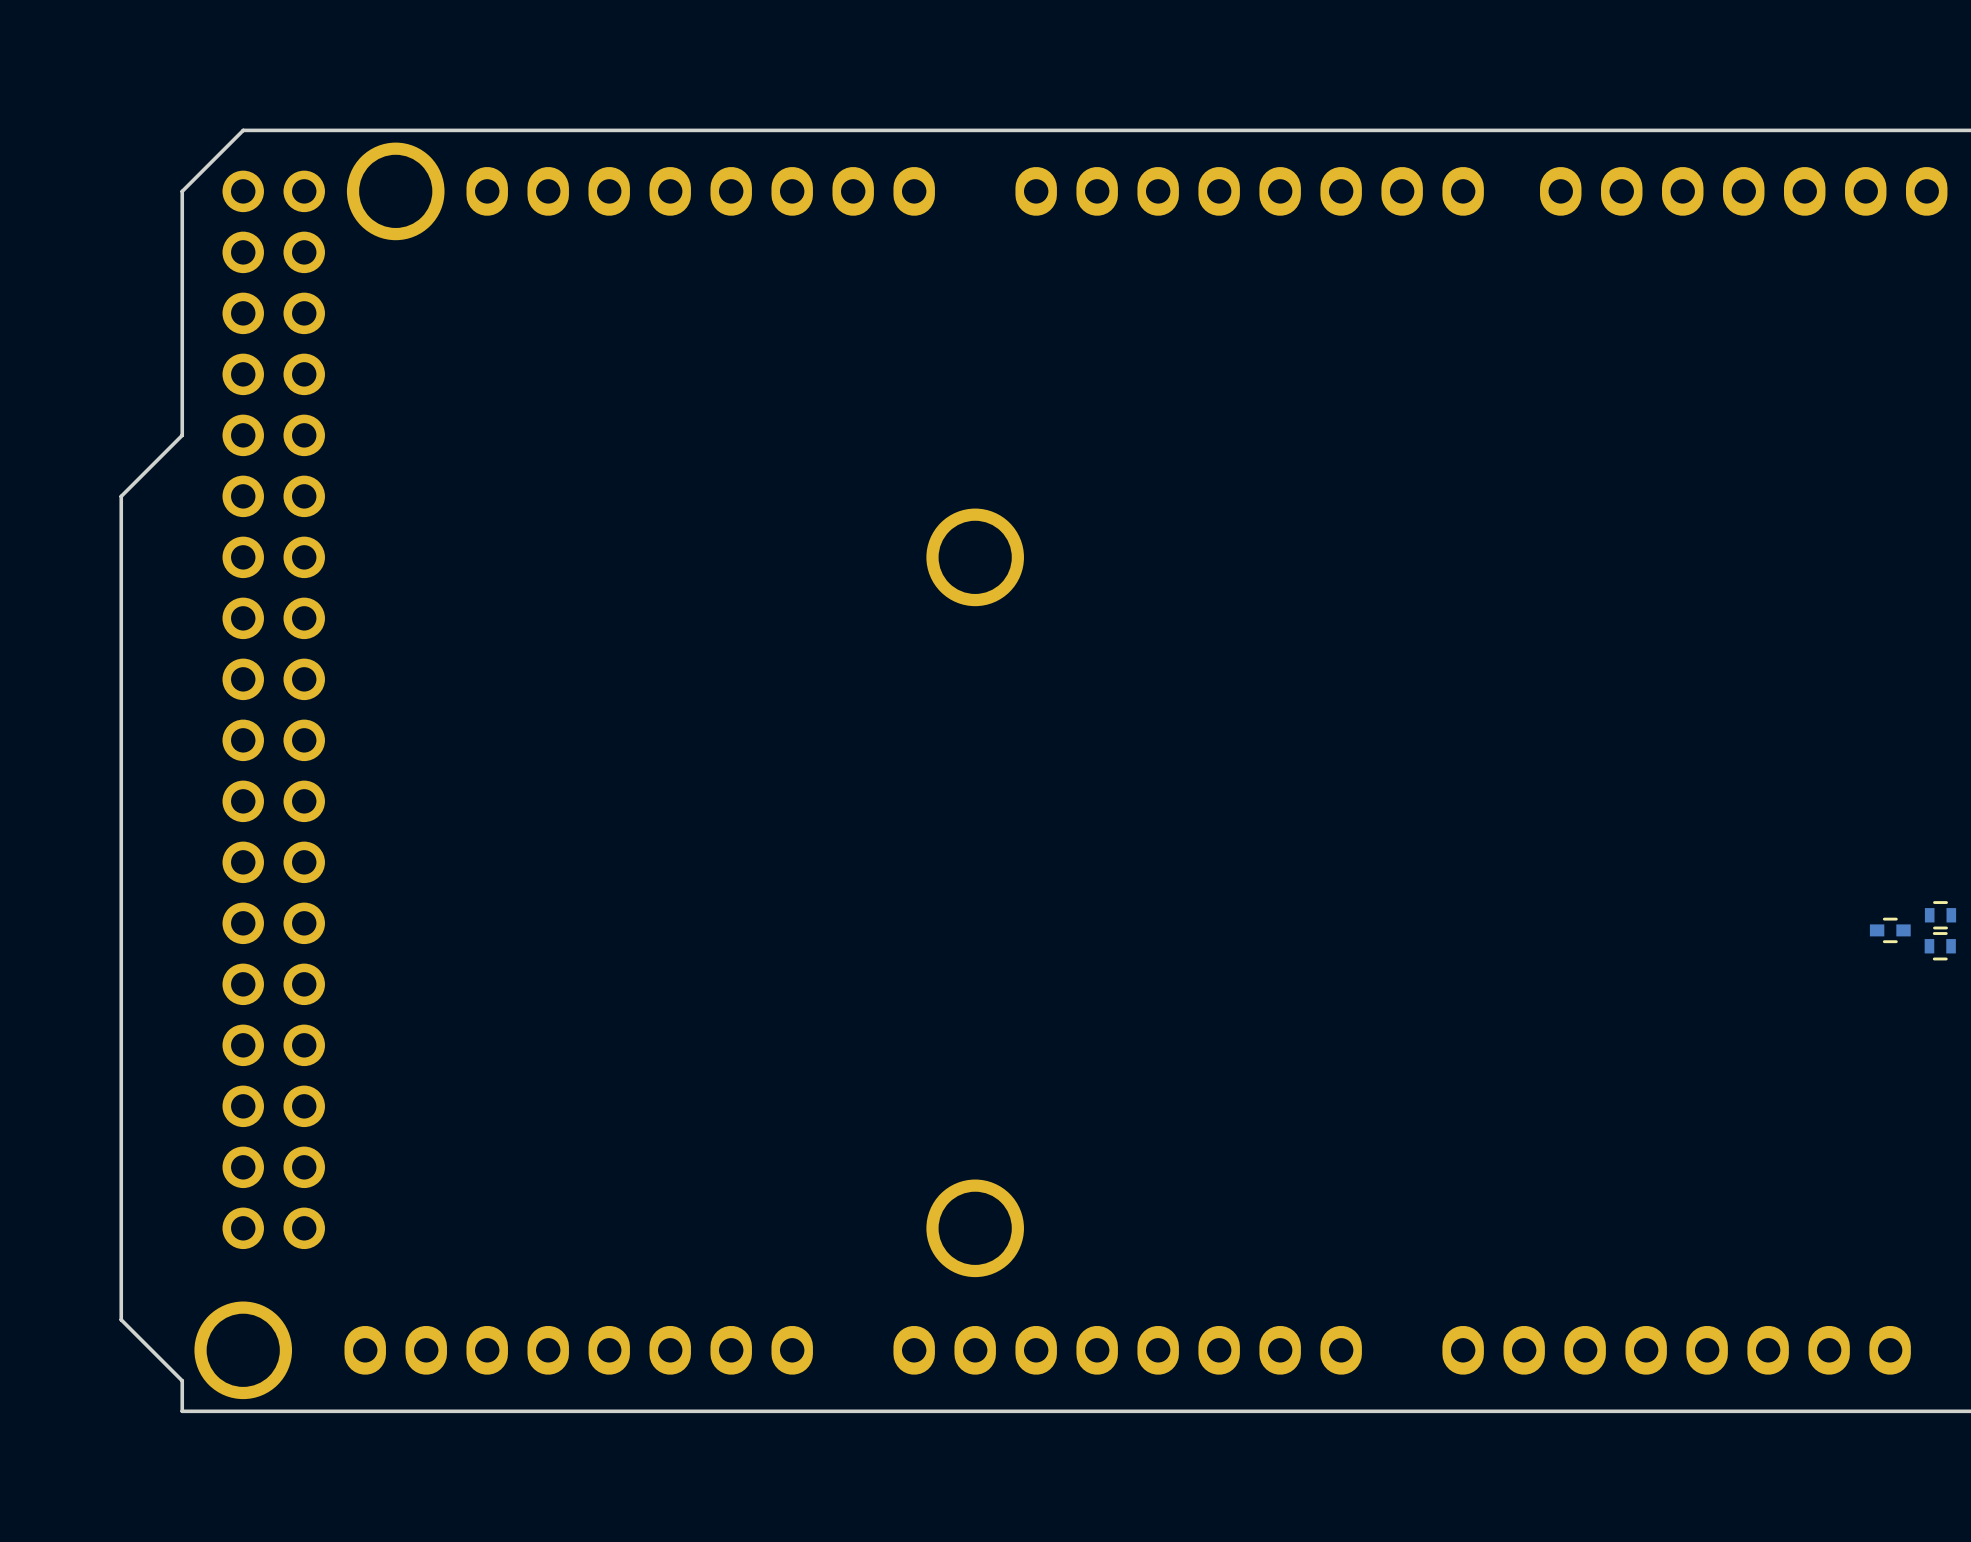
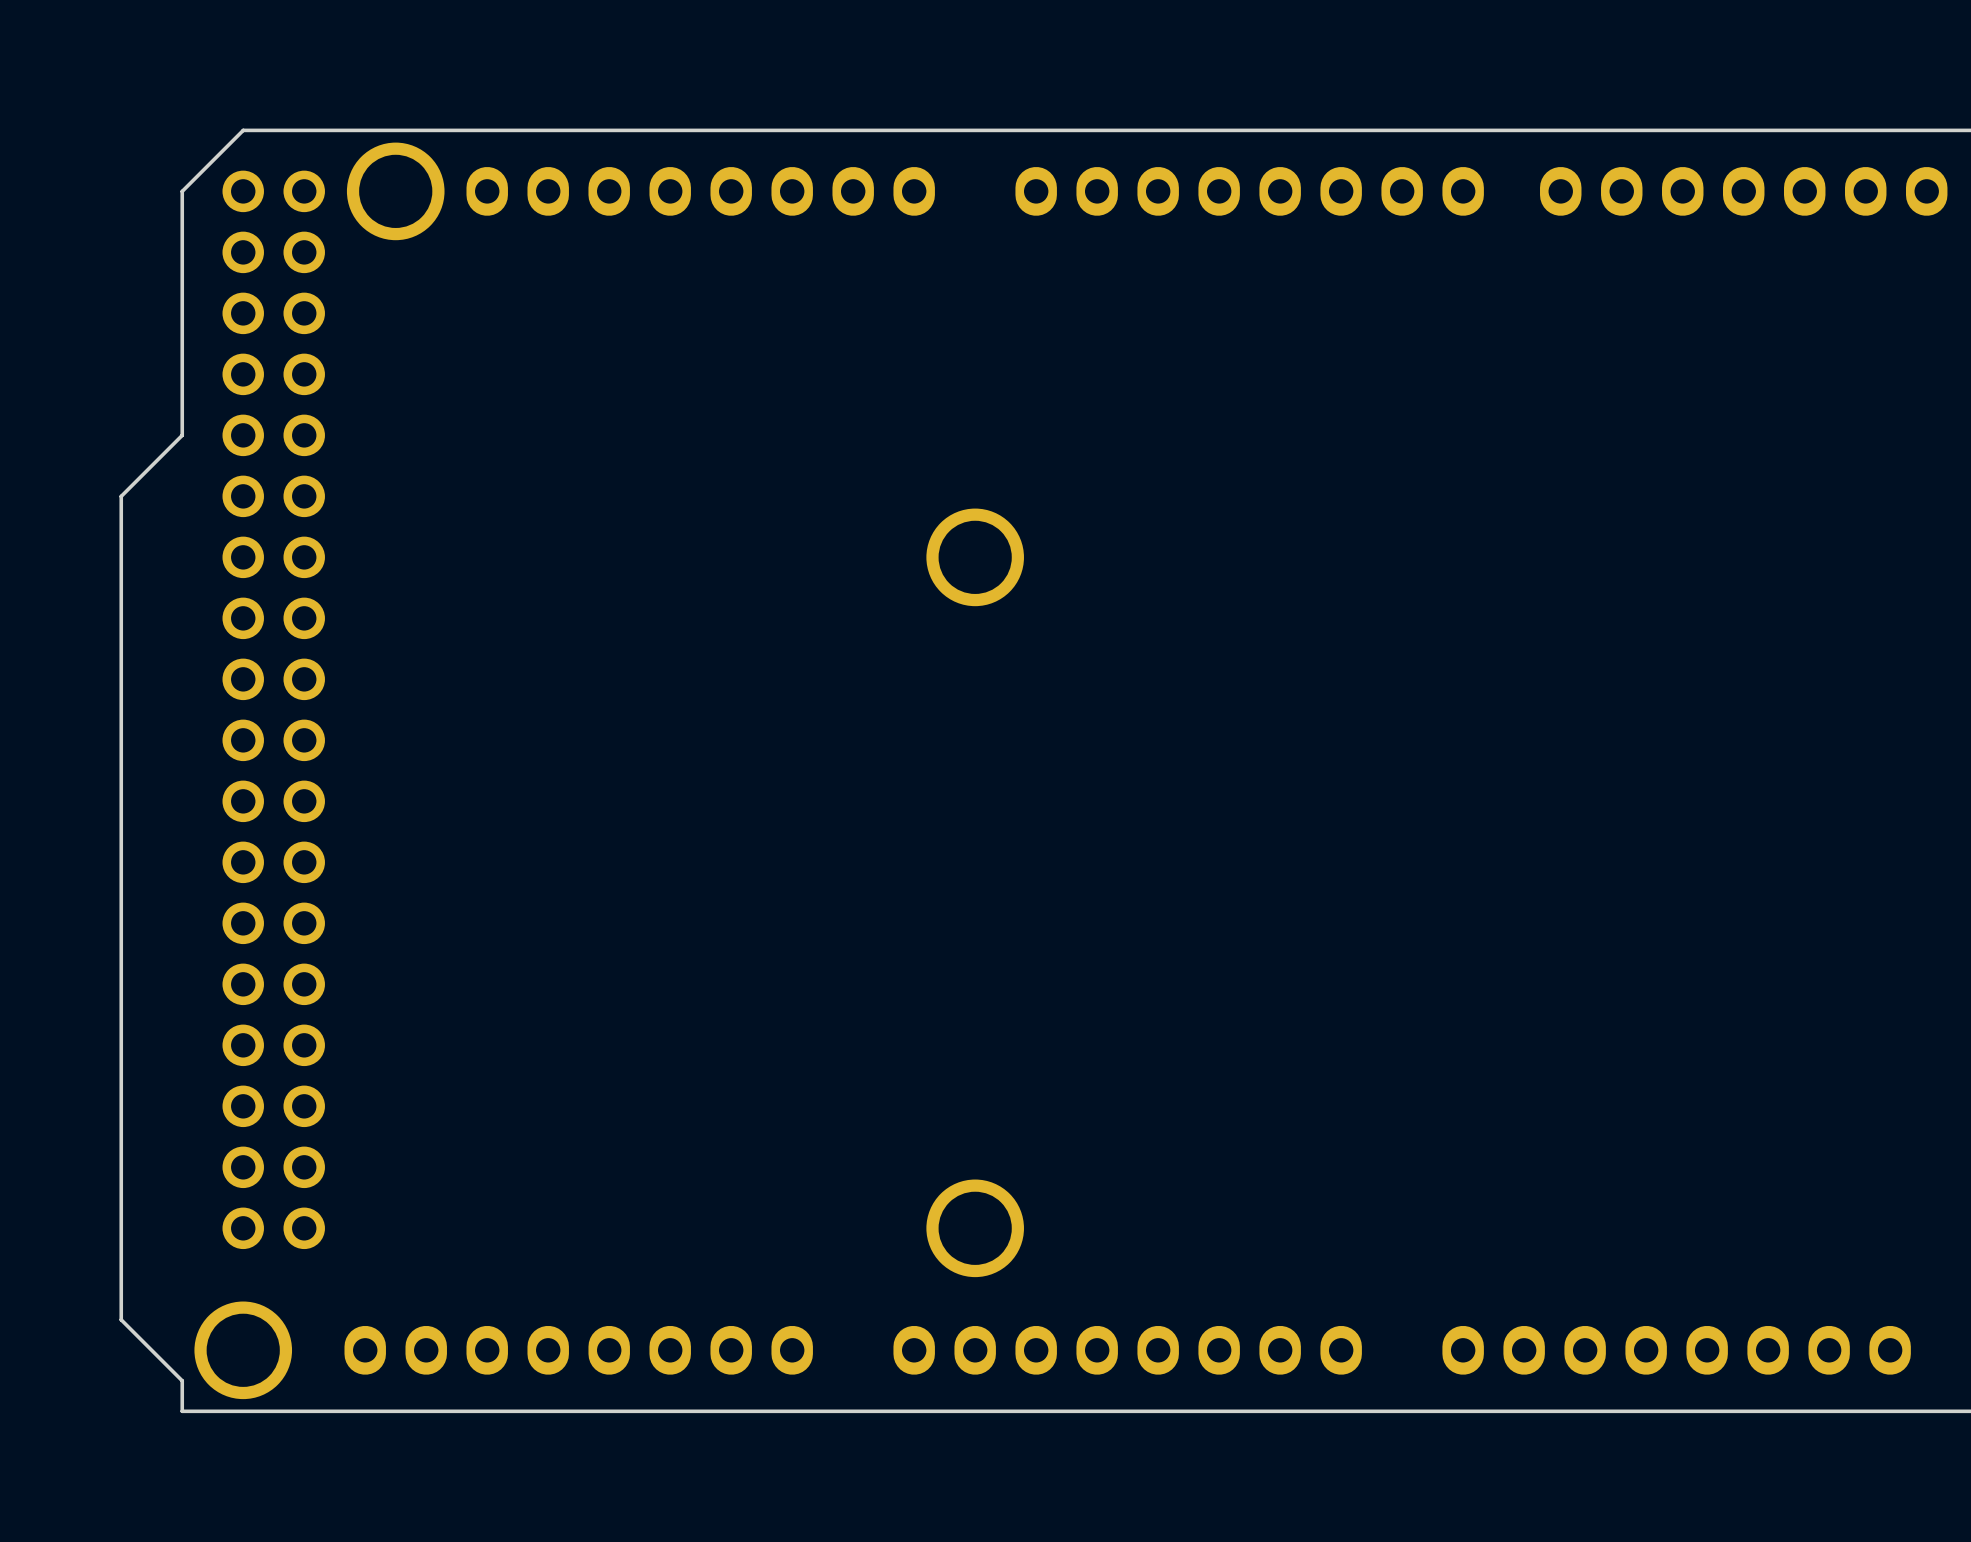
part: (1940, 915) -> none
part: (1890, 930) -> none
part: (1940, 946) -> none

